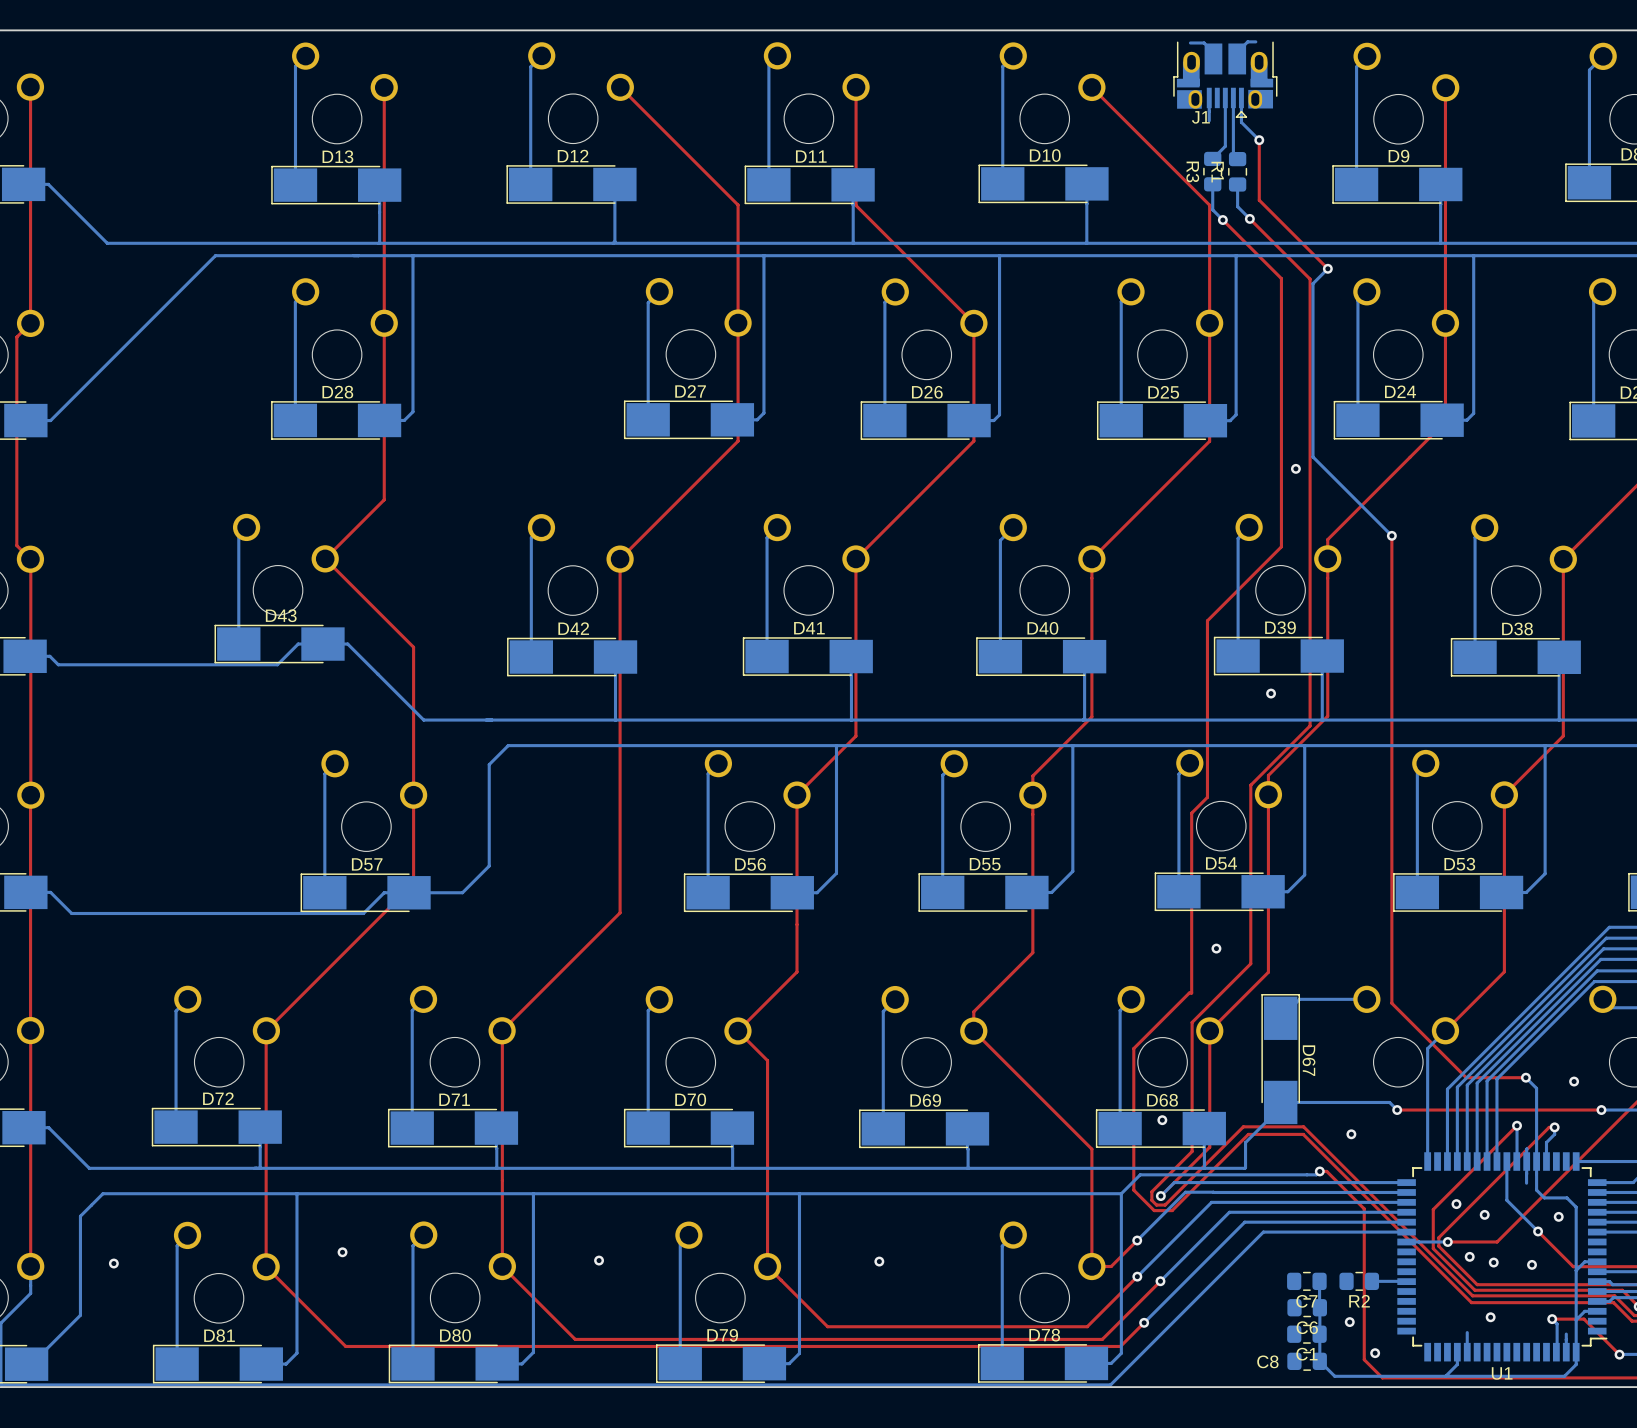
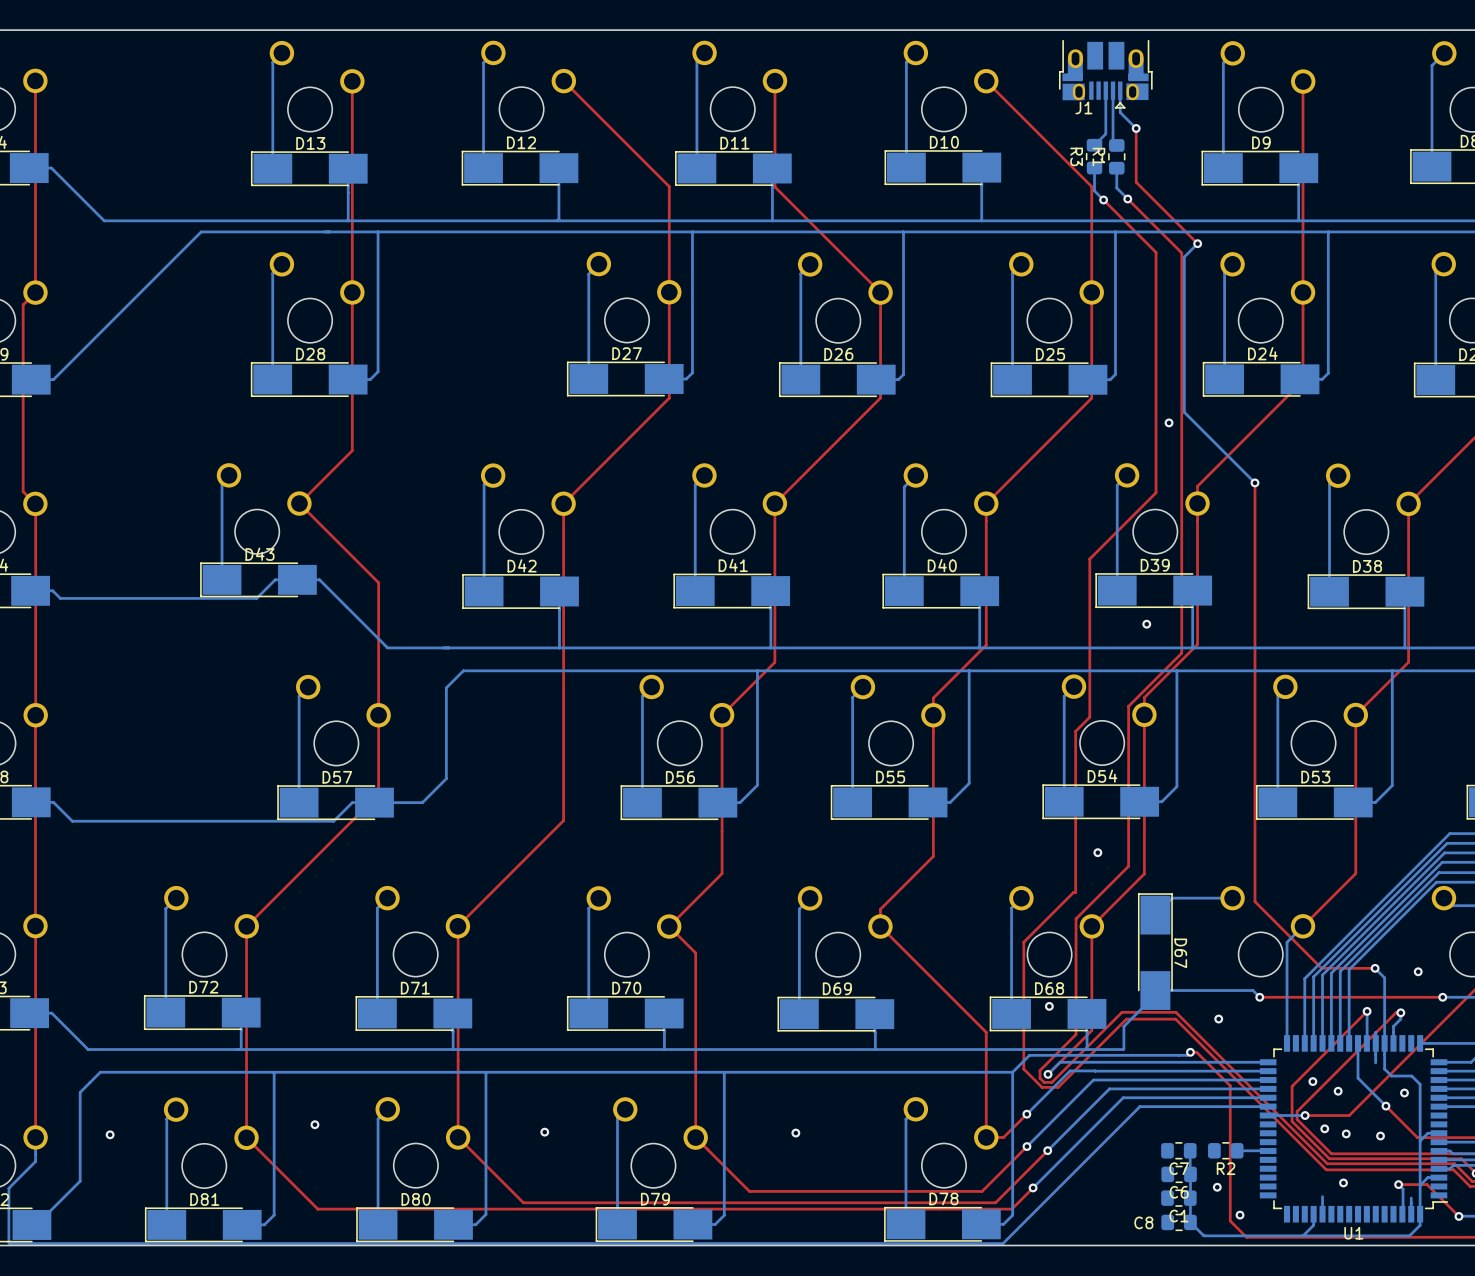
bottom track: (1255, 41) (1247, 41) (1237, 52) (1237, 58) -> none
bottom track: (1190, 42) (1204, 42) (1213, 52) (1213, 58) -> none
bottom track: (1209, 97) (1209, 120) -> none

